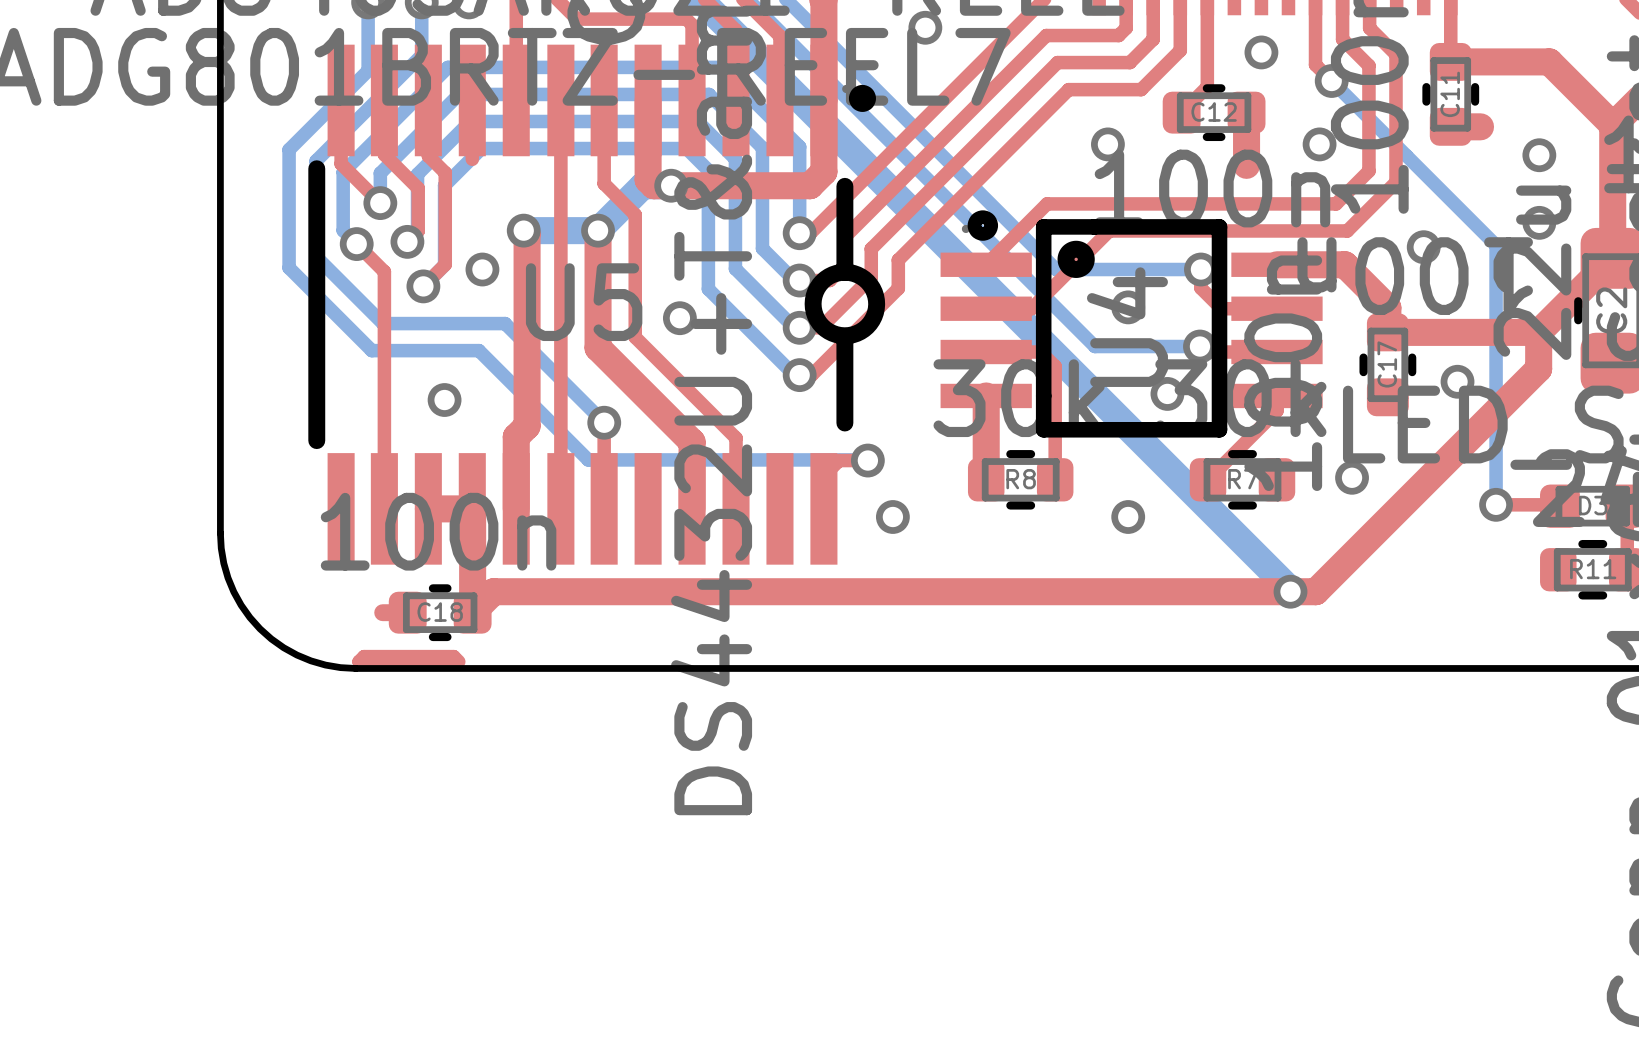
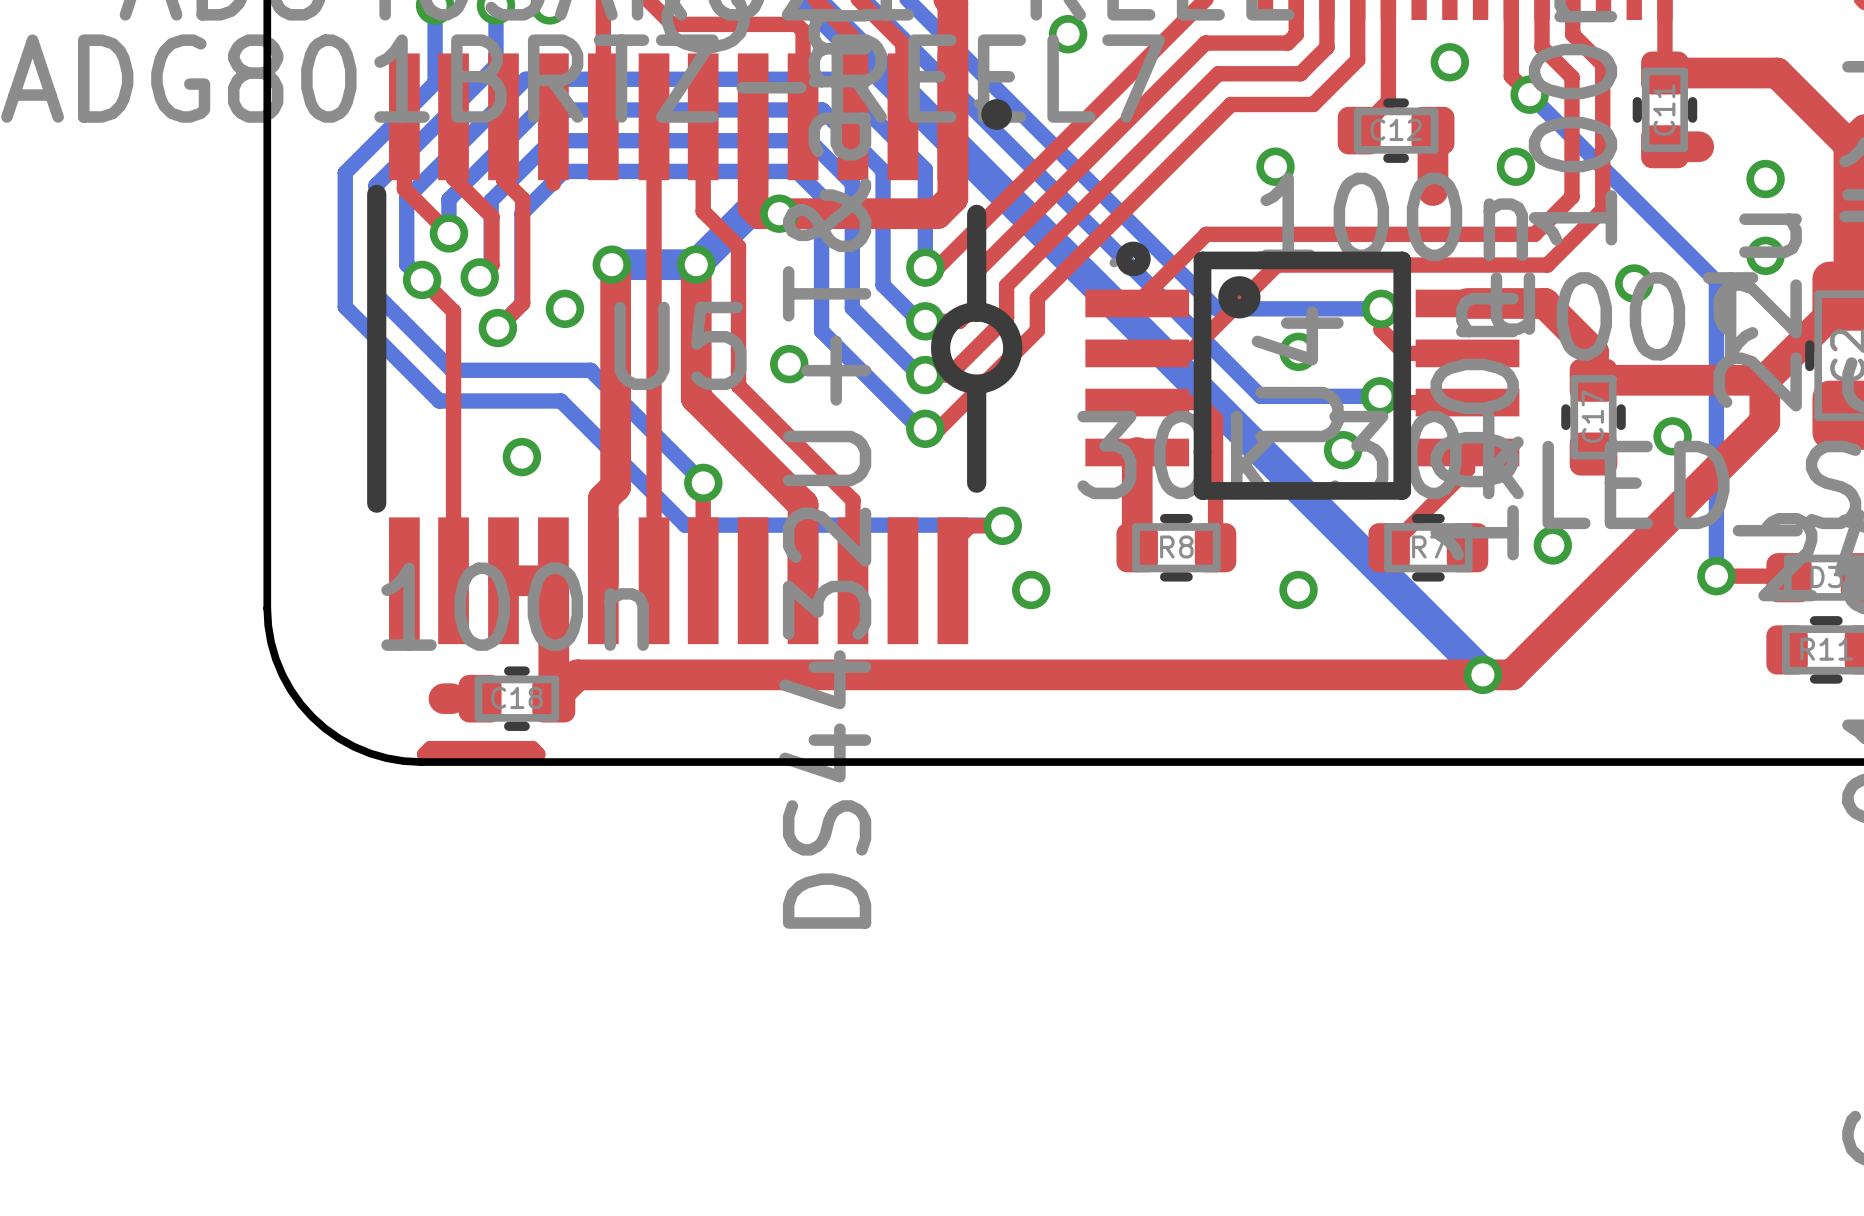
top track: none -> (443, 698) (451, 698)

